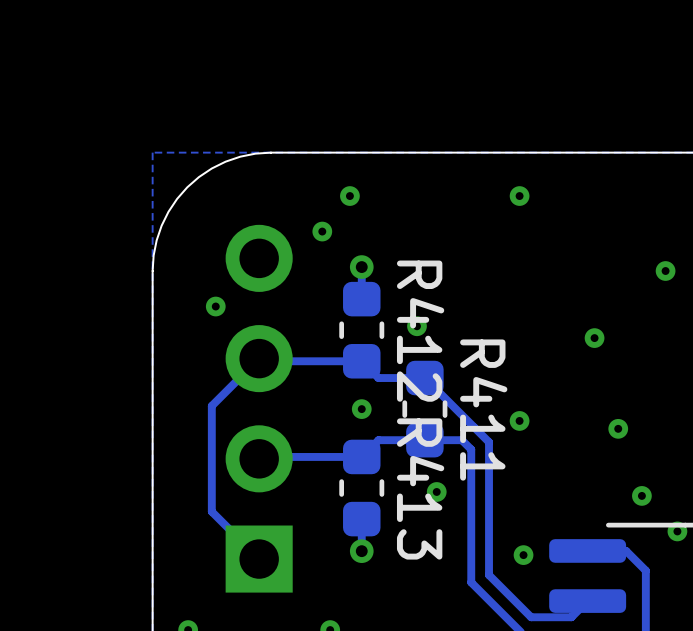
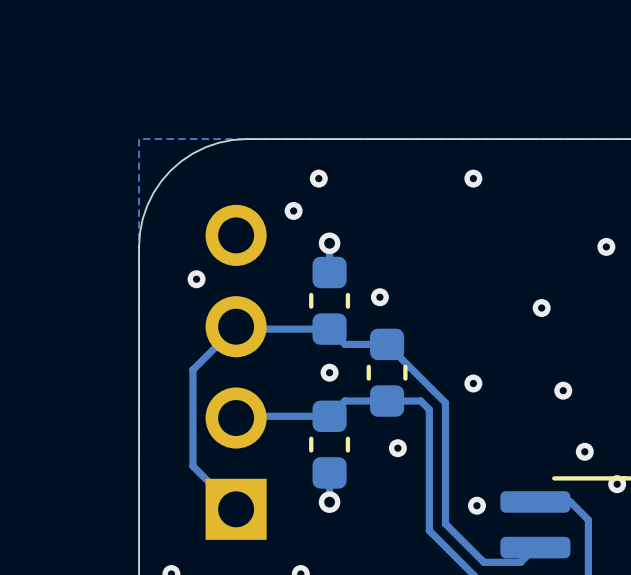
R412 name: R412 (420, 331) -> none
R411 name: R411 (483, 410) -> none
R413 name: R413 (420, 488) -> none

